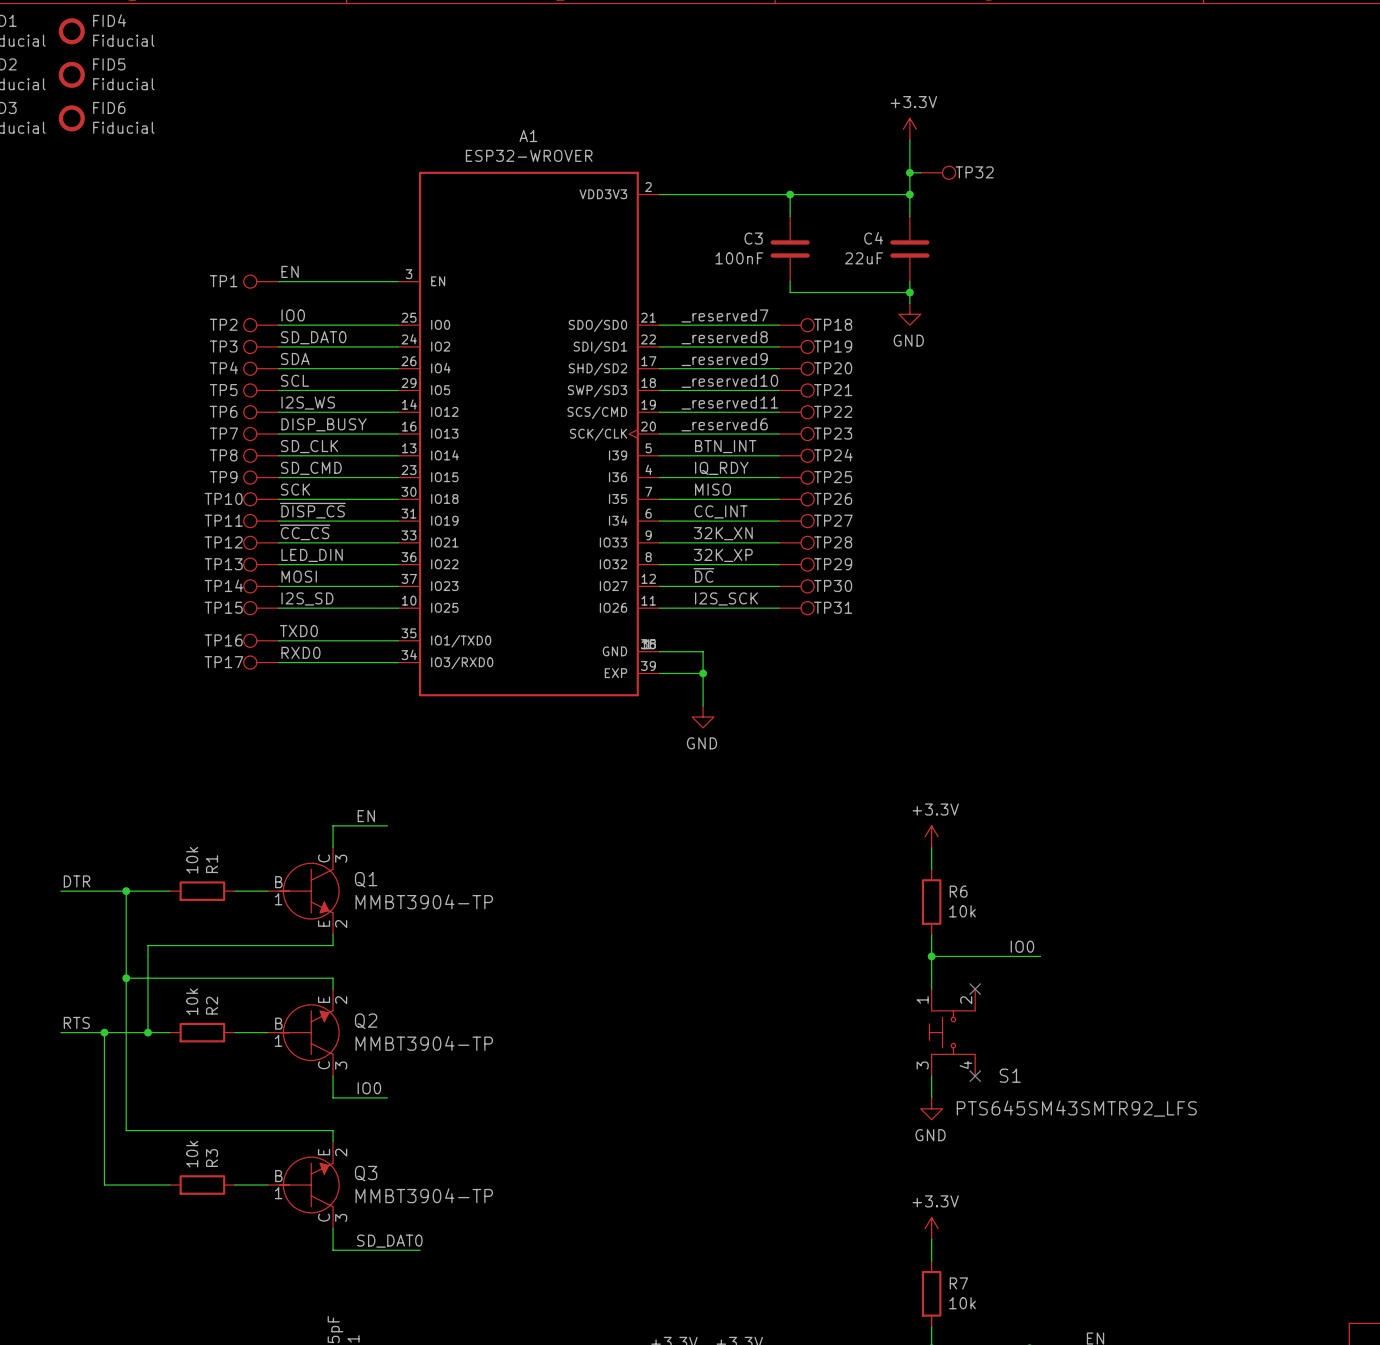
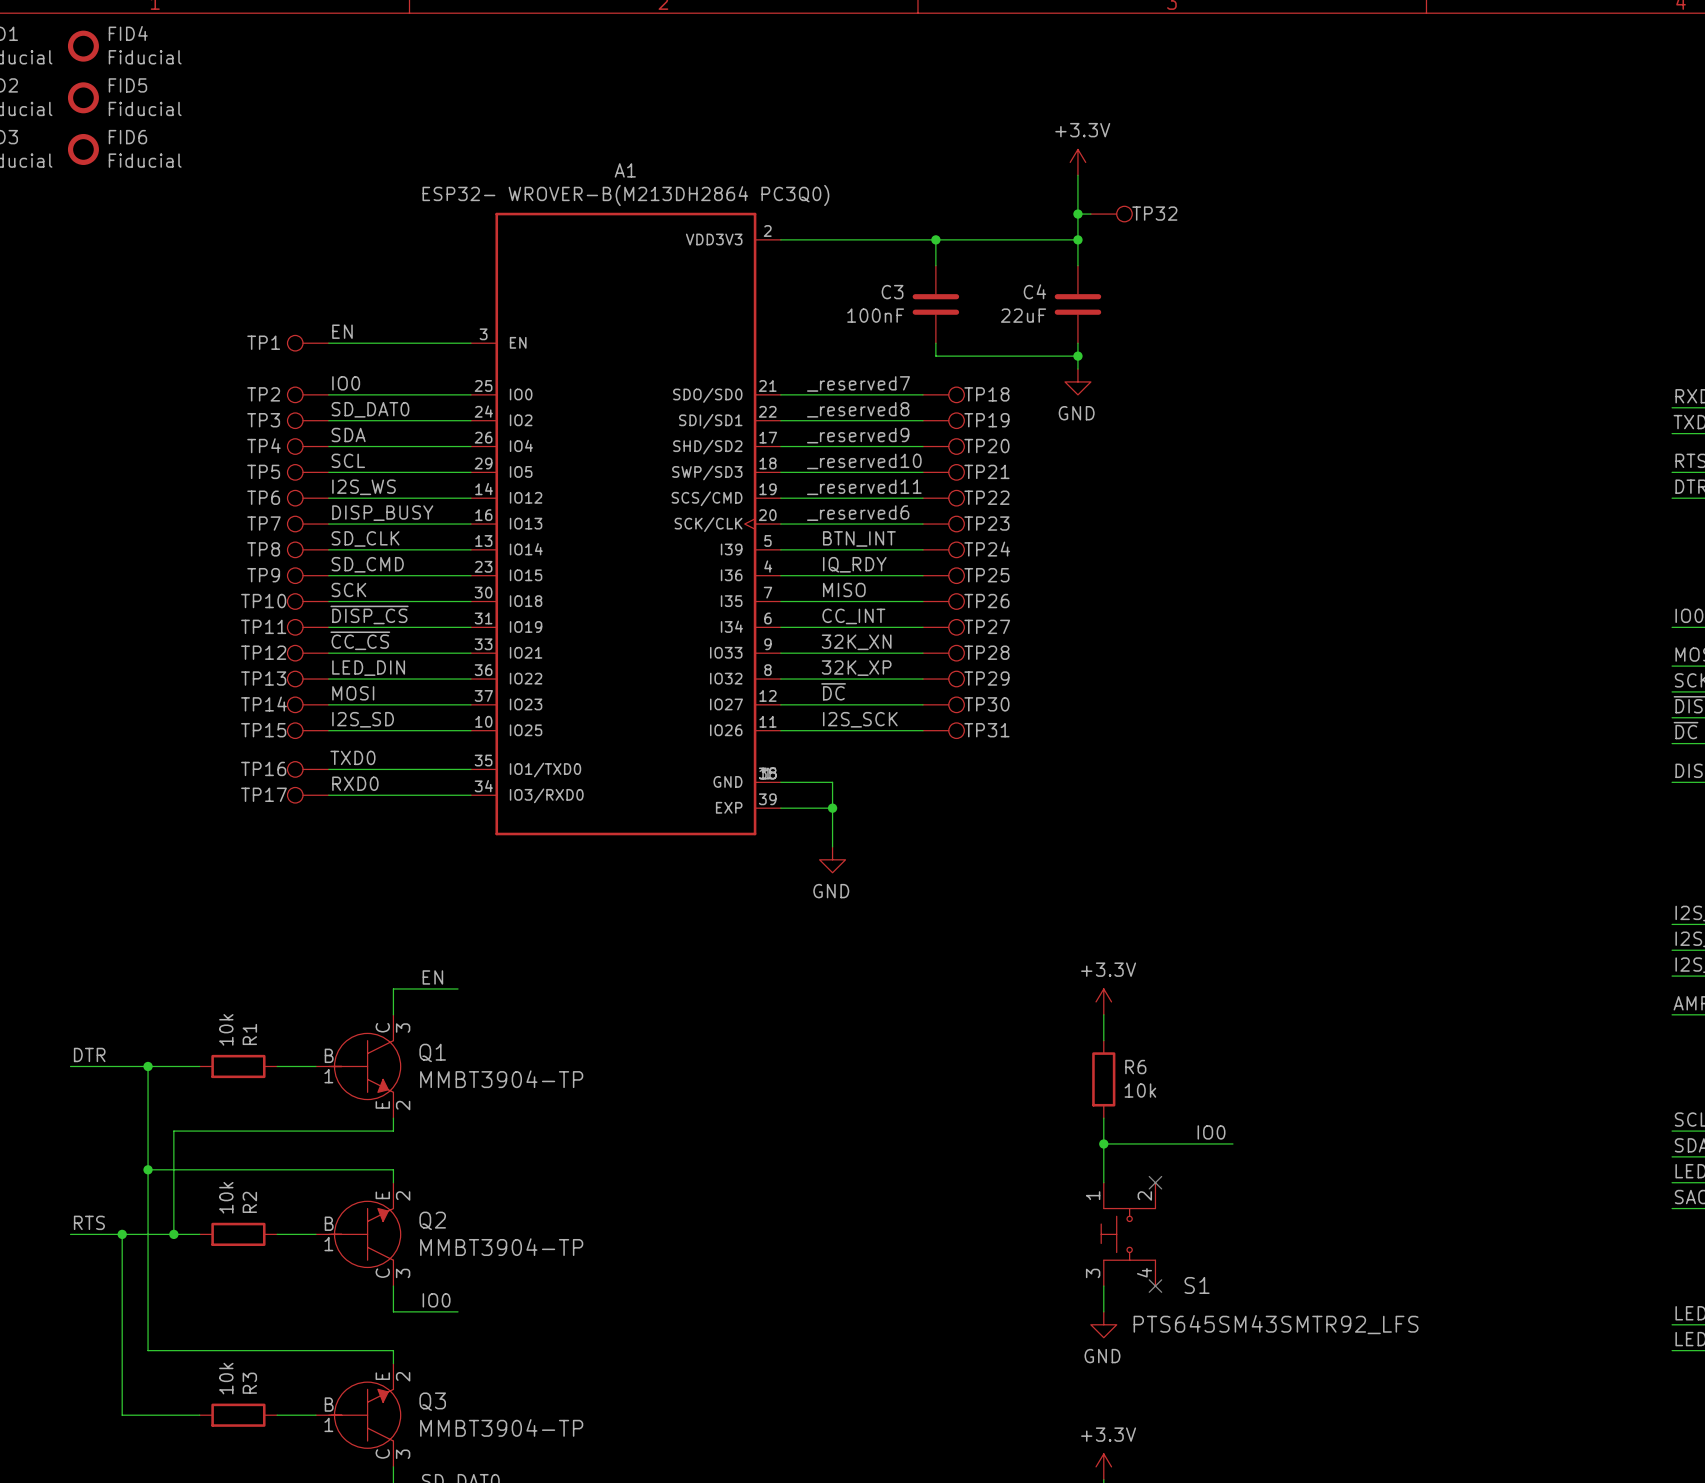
A1 value: ESP32-WROVER (529, 155) -> ESP32- WROVER-B(M213DH2864 PC3Q0) (625, 195)

